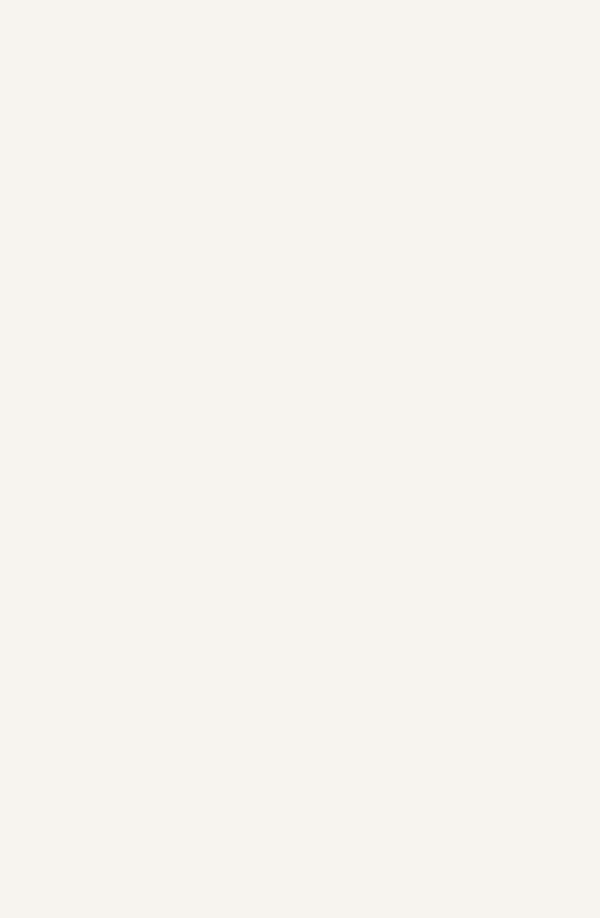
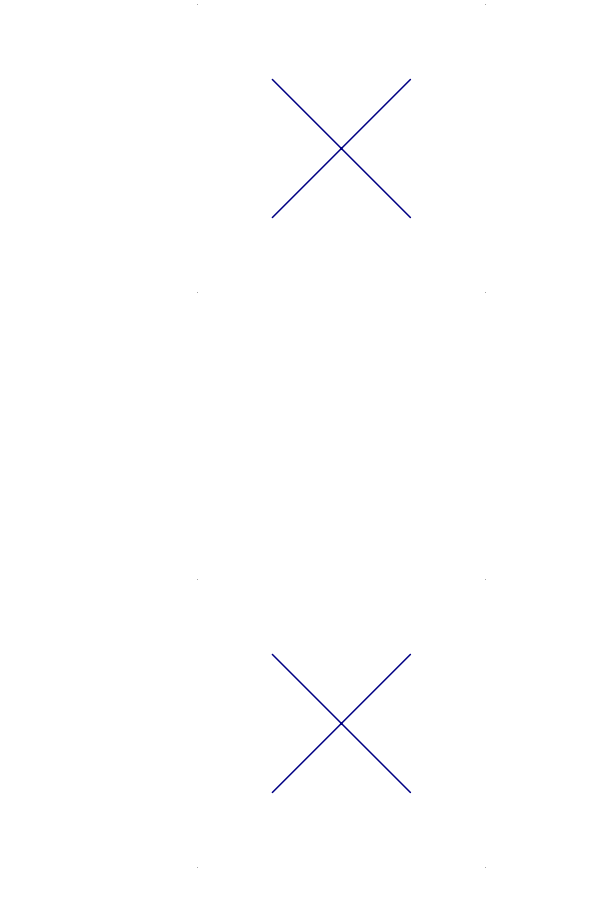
no-connect mark: none -> (341, 148)
no-connect mark: none -> (341, 723)

